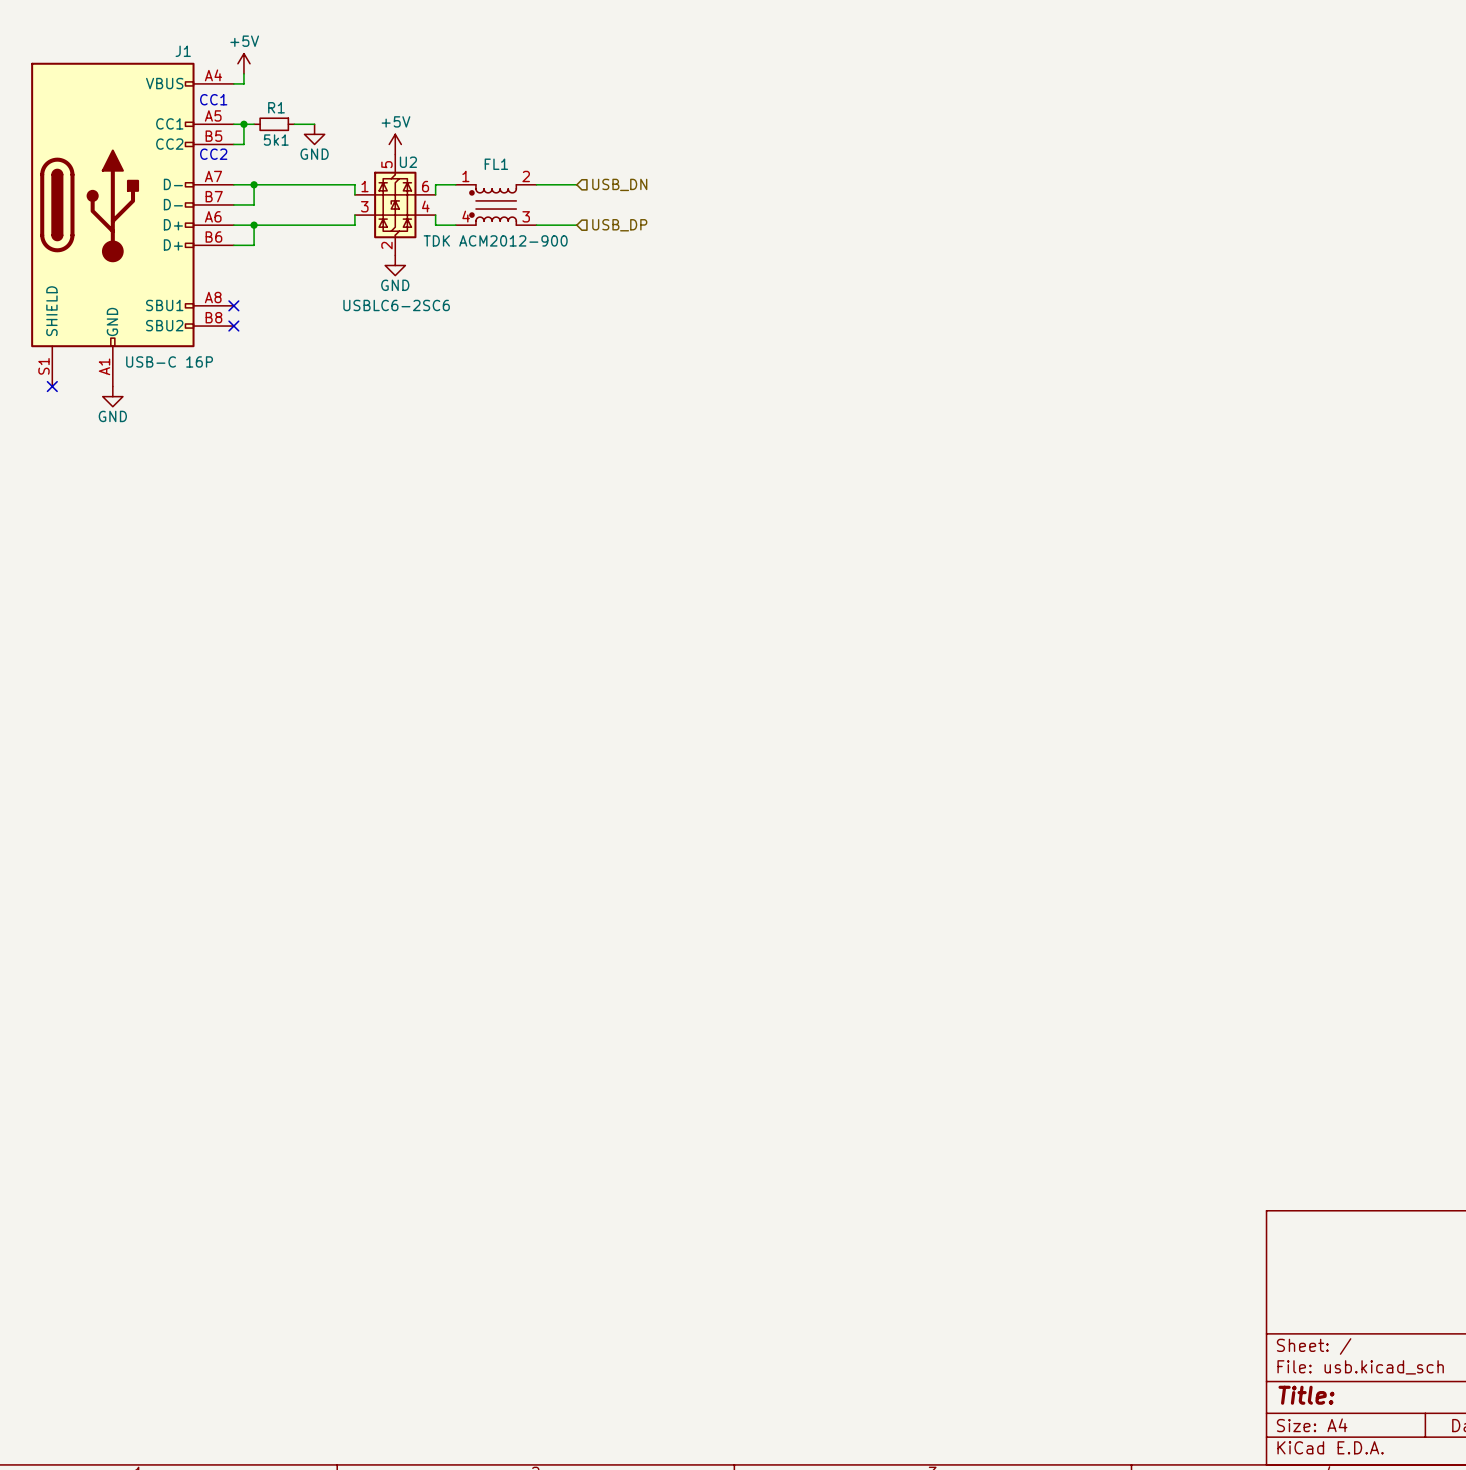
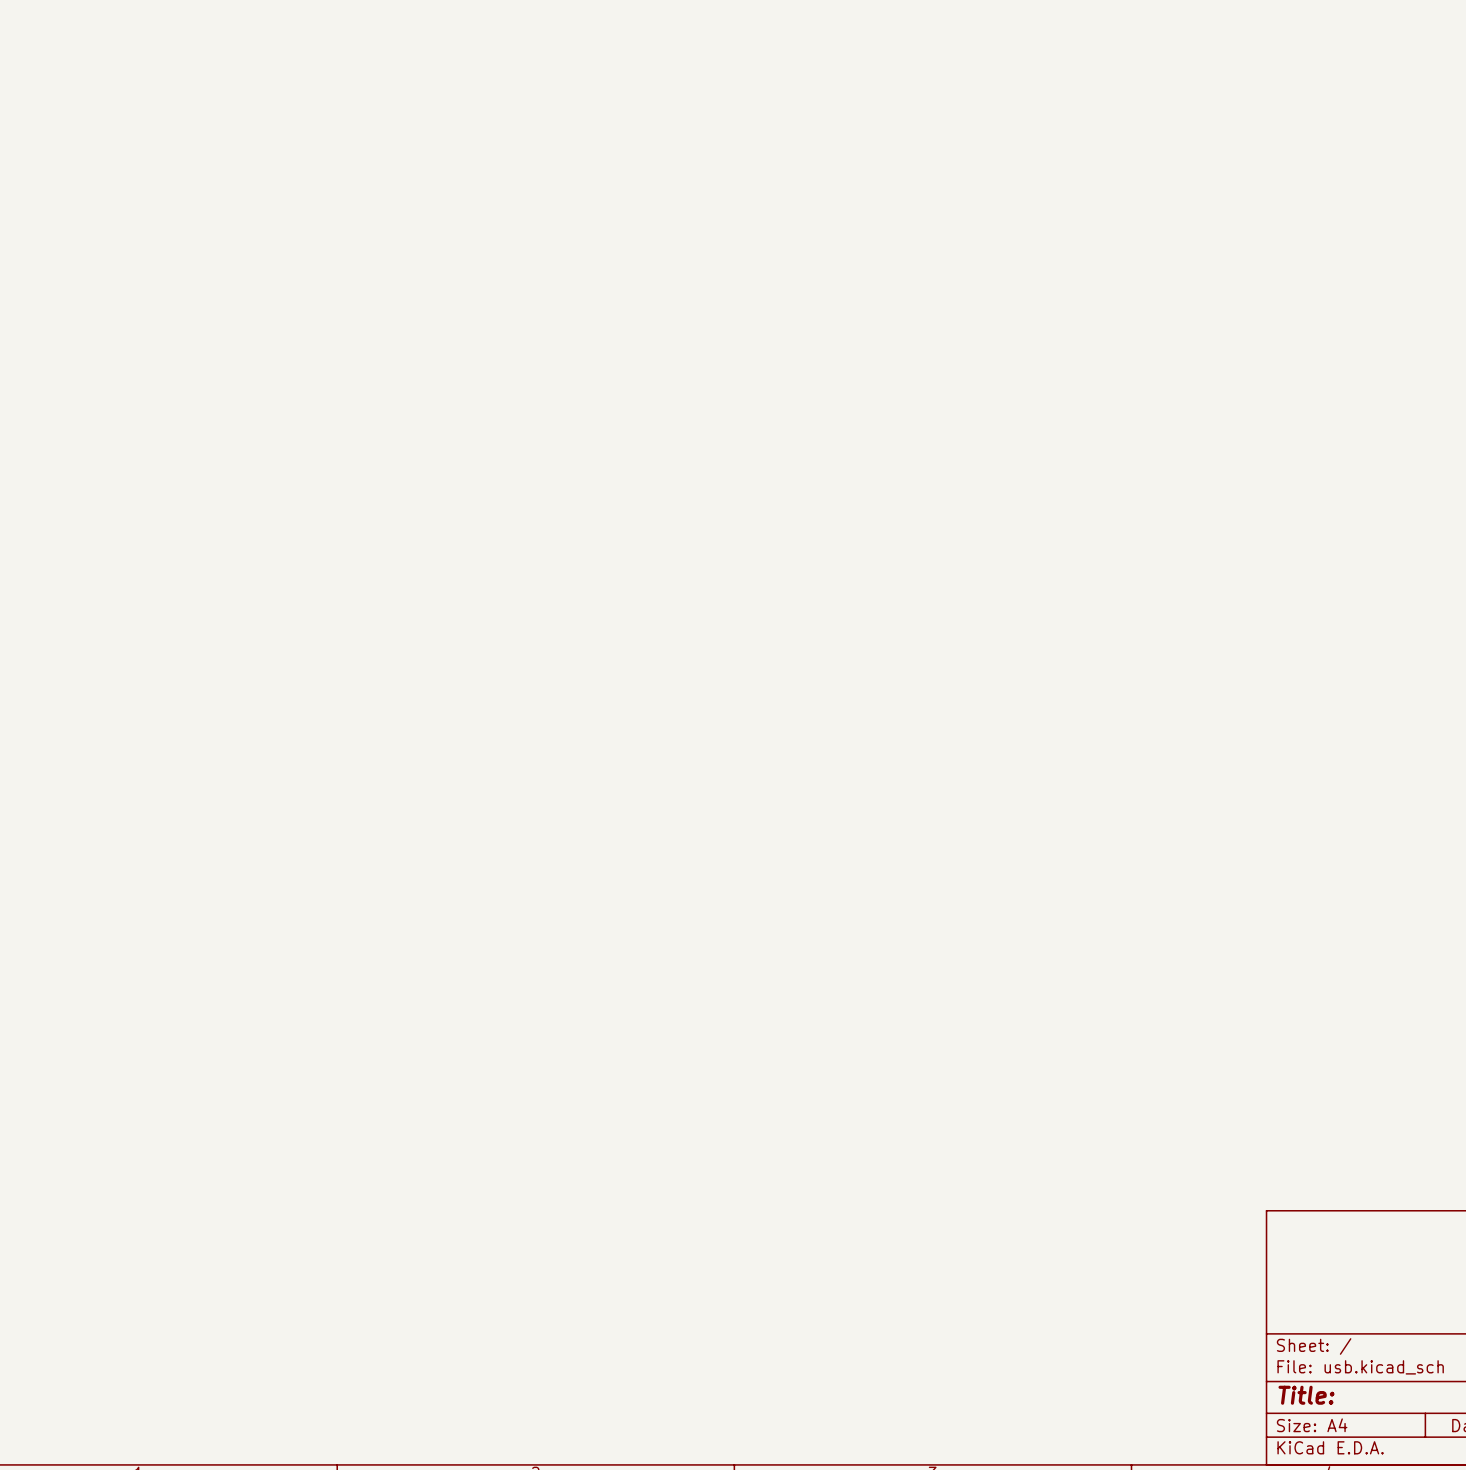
power symbol: +5V (243, 63) -> none
wire: (243, 73) (243, 83) (233, 83) -> none
text: CC1 (213, 99) -> none
wire: (233, 124) (254, 124) -> none
wire: (243, 124) (243, 144) (233, 144) -> none
junction: (243, 124) -> none
R1: 5k1 (274, 124) -> none
wire: (294, 124) (314, 124) -> none
power symbol: GND (314, 134) -> none
power symbol: +5V (395, 144) -> none
text: CC2 (213, 154) -> none
wire: (233, 184) (354, 184) (354, 194) -> none
wire: (254, 184) (254, 204) (233, 204) -> none
junction: (254, 184) -> none
wire: (455, 184) (435, 184) (435, 194) -> none
wire: (536, 184) (576, 184) -> none
hierarchical label: USB_DN (619, 184) -> none
U2: USBLC6-2SC6 (395, 204) -> none
FL1: TDK ACM2012-900 (496, 204) -> none
wire: (354, 215) (354, 225) (233, 225) -> none
wire: (435, 215) (435, 225) (455, 225) -> none
J1: USB-C 16P (132, 224) -> none
wire: (254, 225) (254, 245) (233, 245) -> none
junction: (254, 225) -> none
wire: (536, 225) (576, 225) -> none
hierarchical label: USB_DP (619, 225) -> none
power symbol: GND (395, 265) -> none
no-connect mark: (233, 305) -> none
no-connect mark: (233, 326) -> none
no-connect mark: (52, 386) -> none
power symbol: GND (112, 396) -> none

